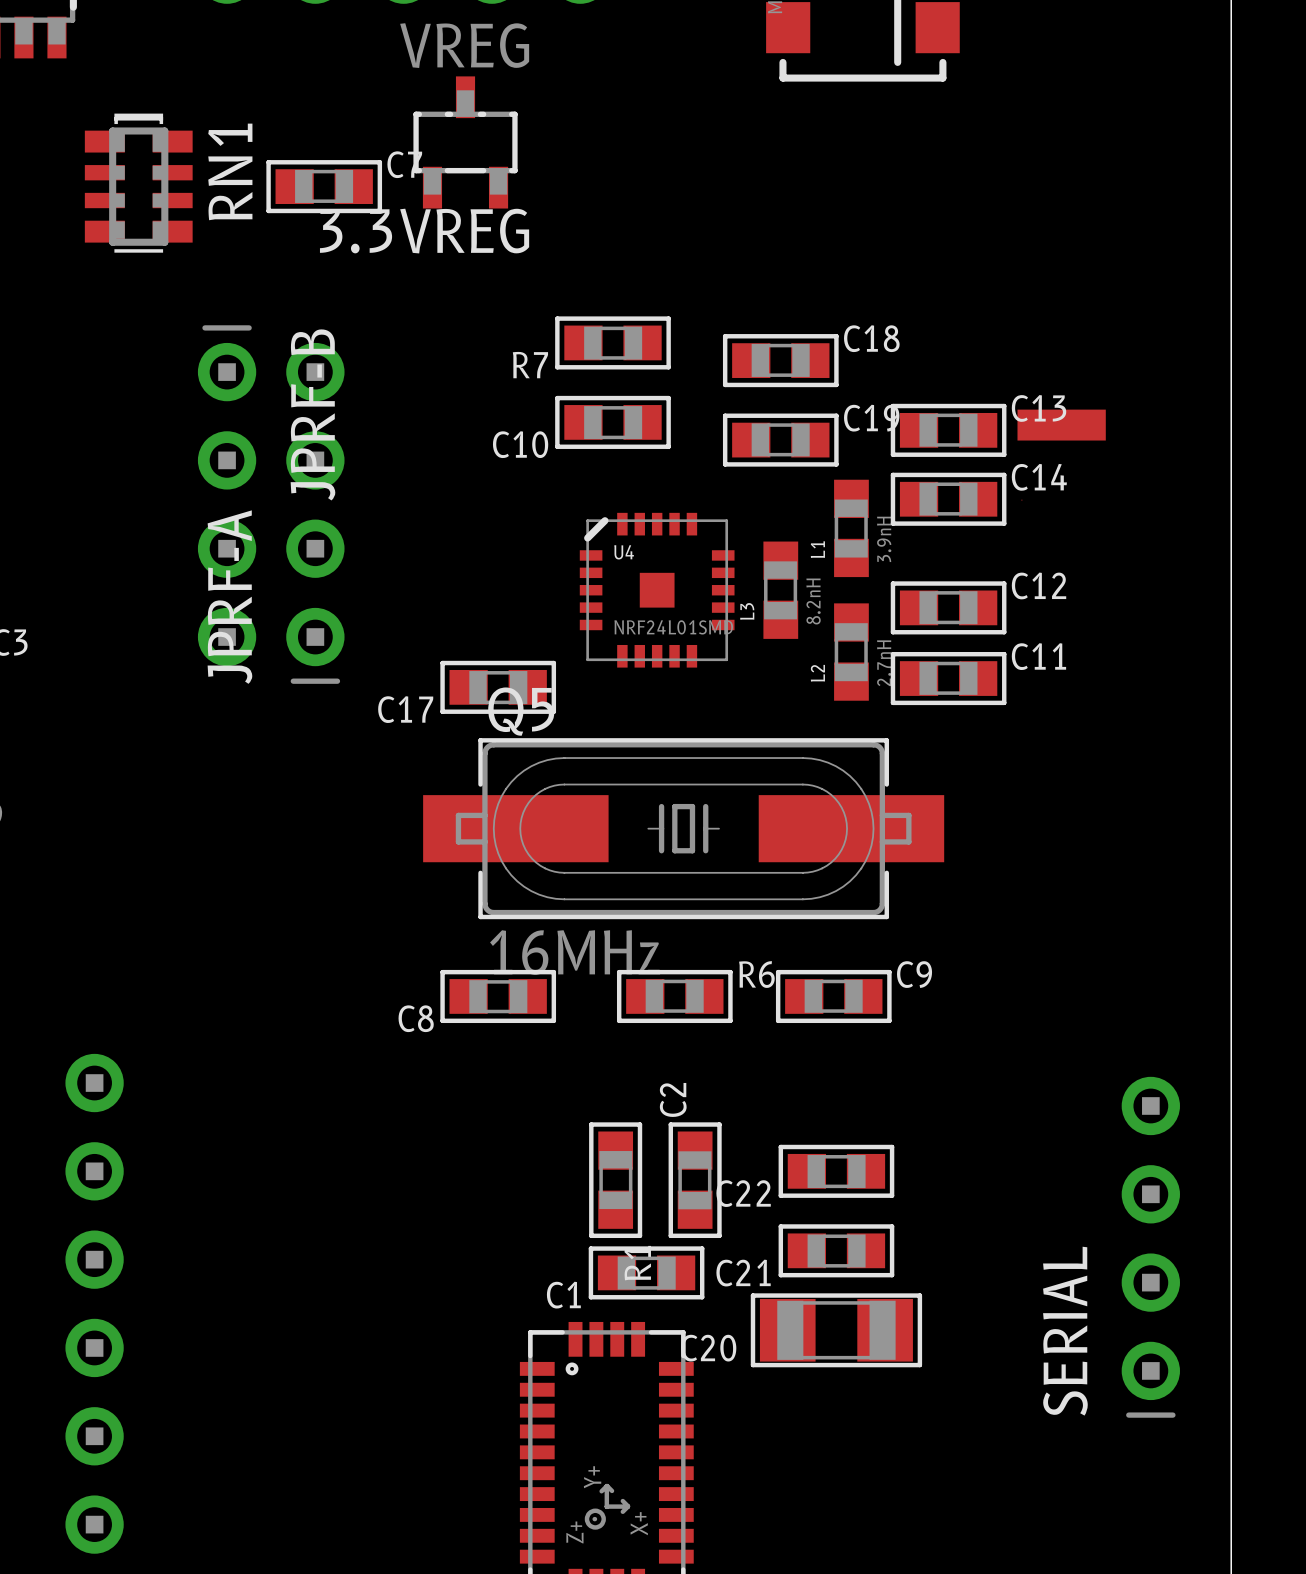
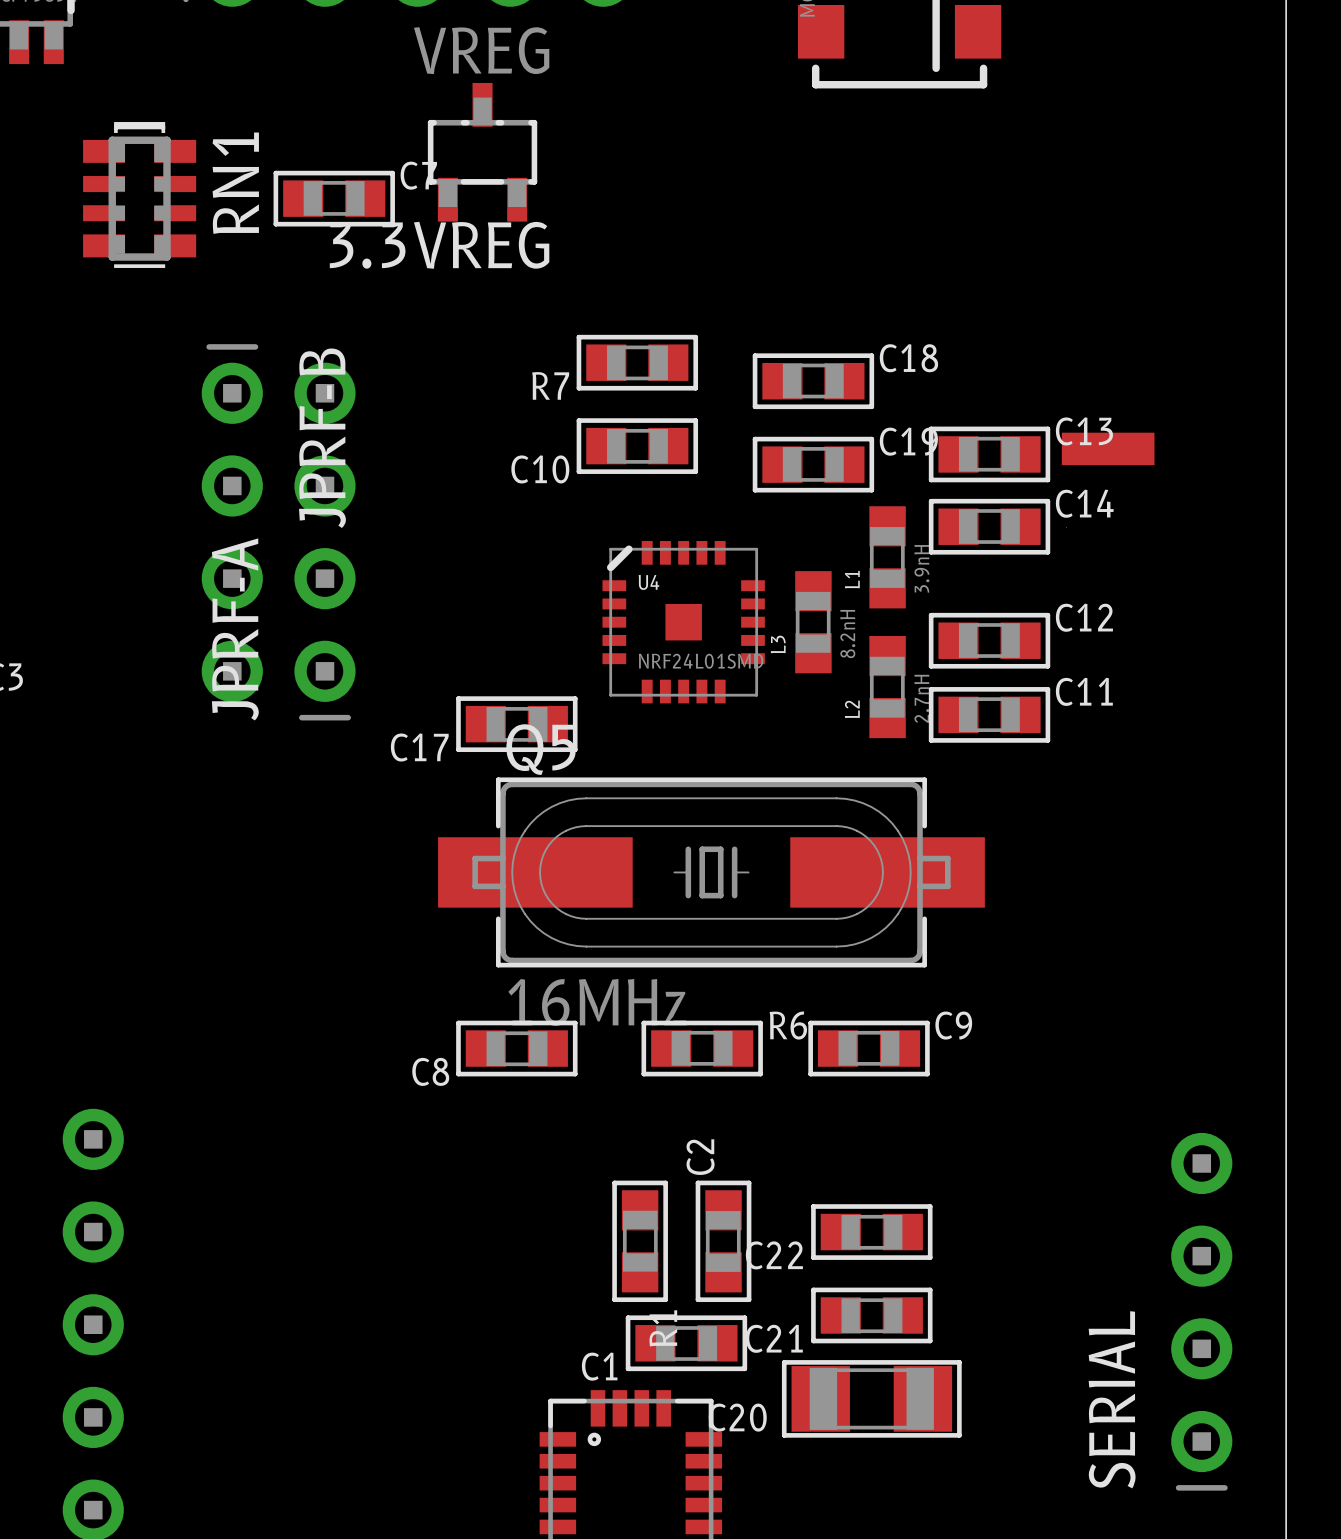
C1 position: (646, 1272) -> (686, 1343)

